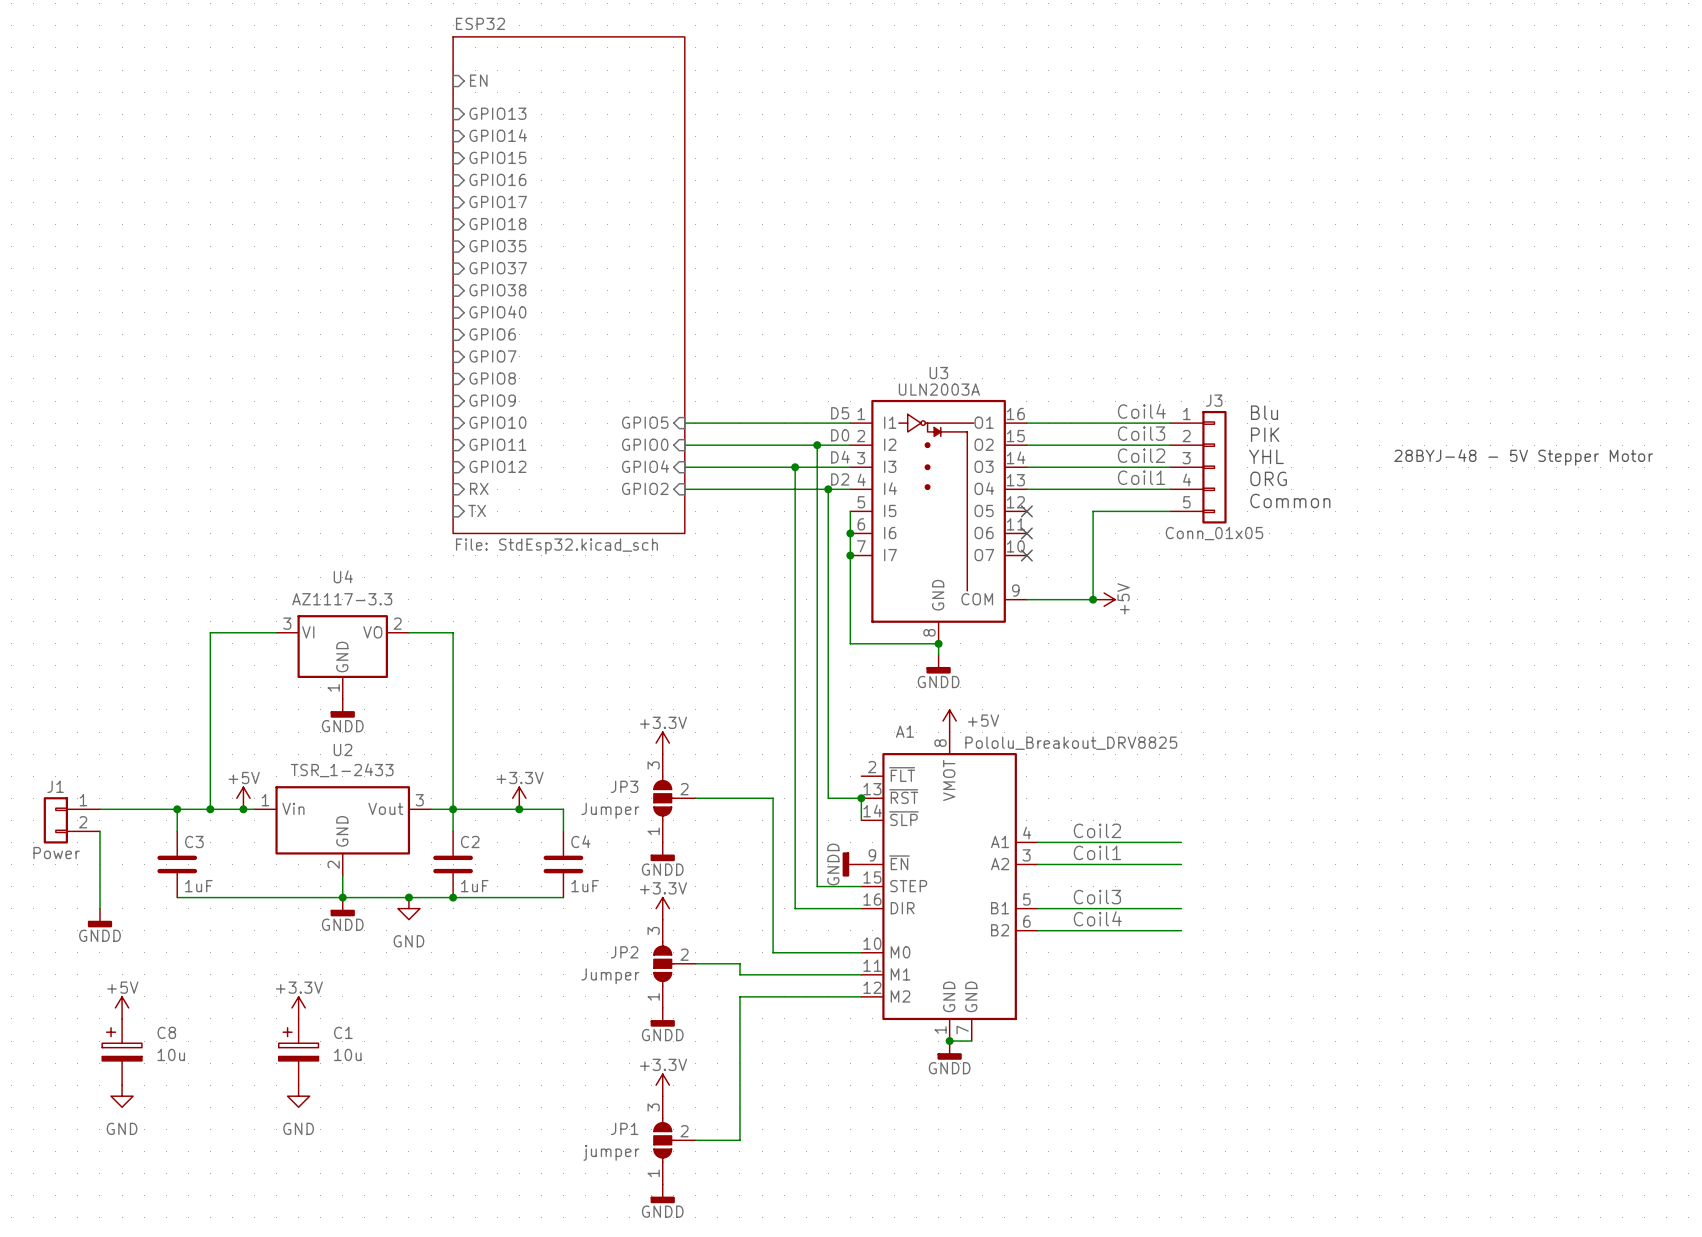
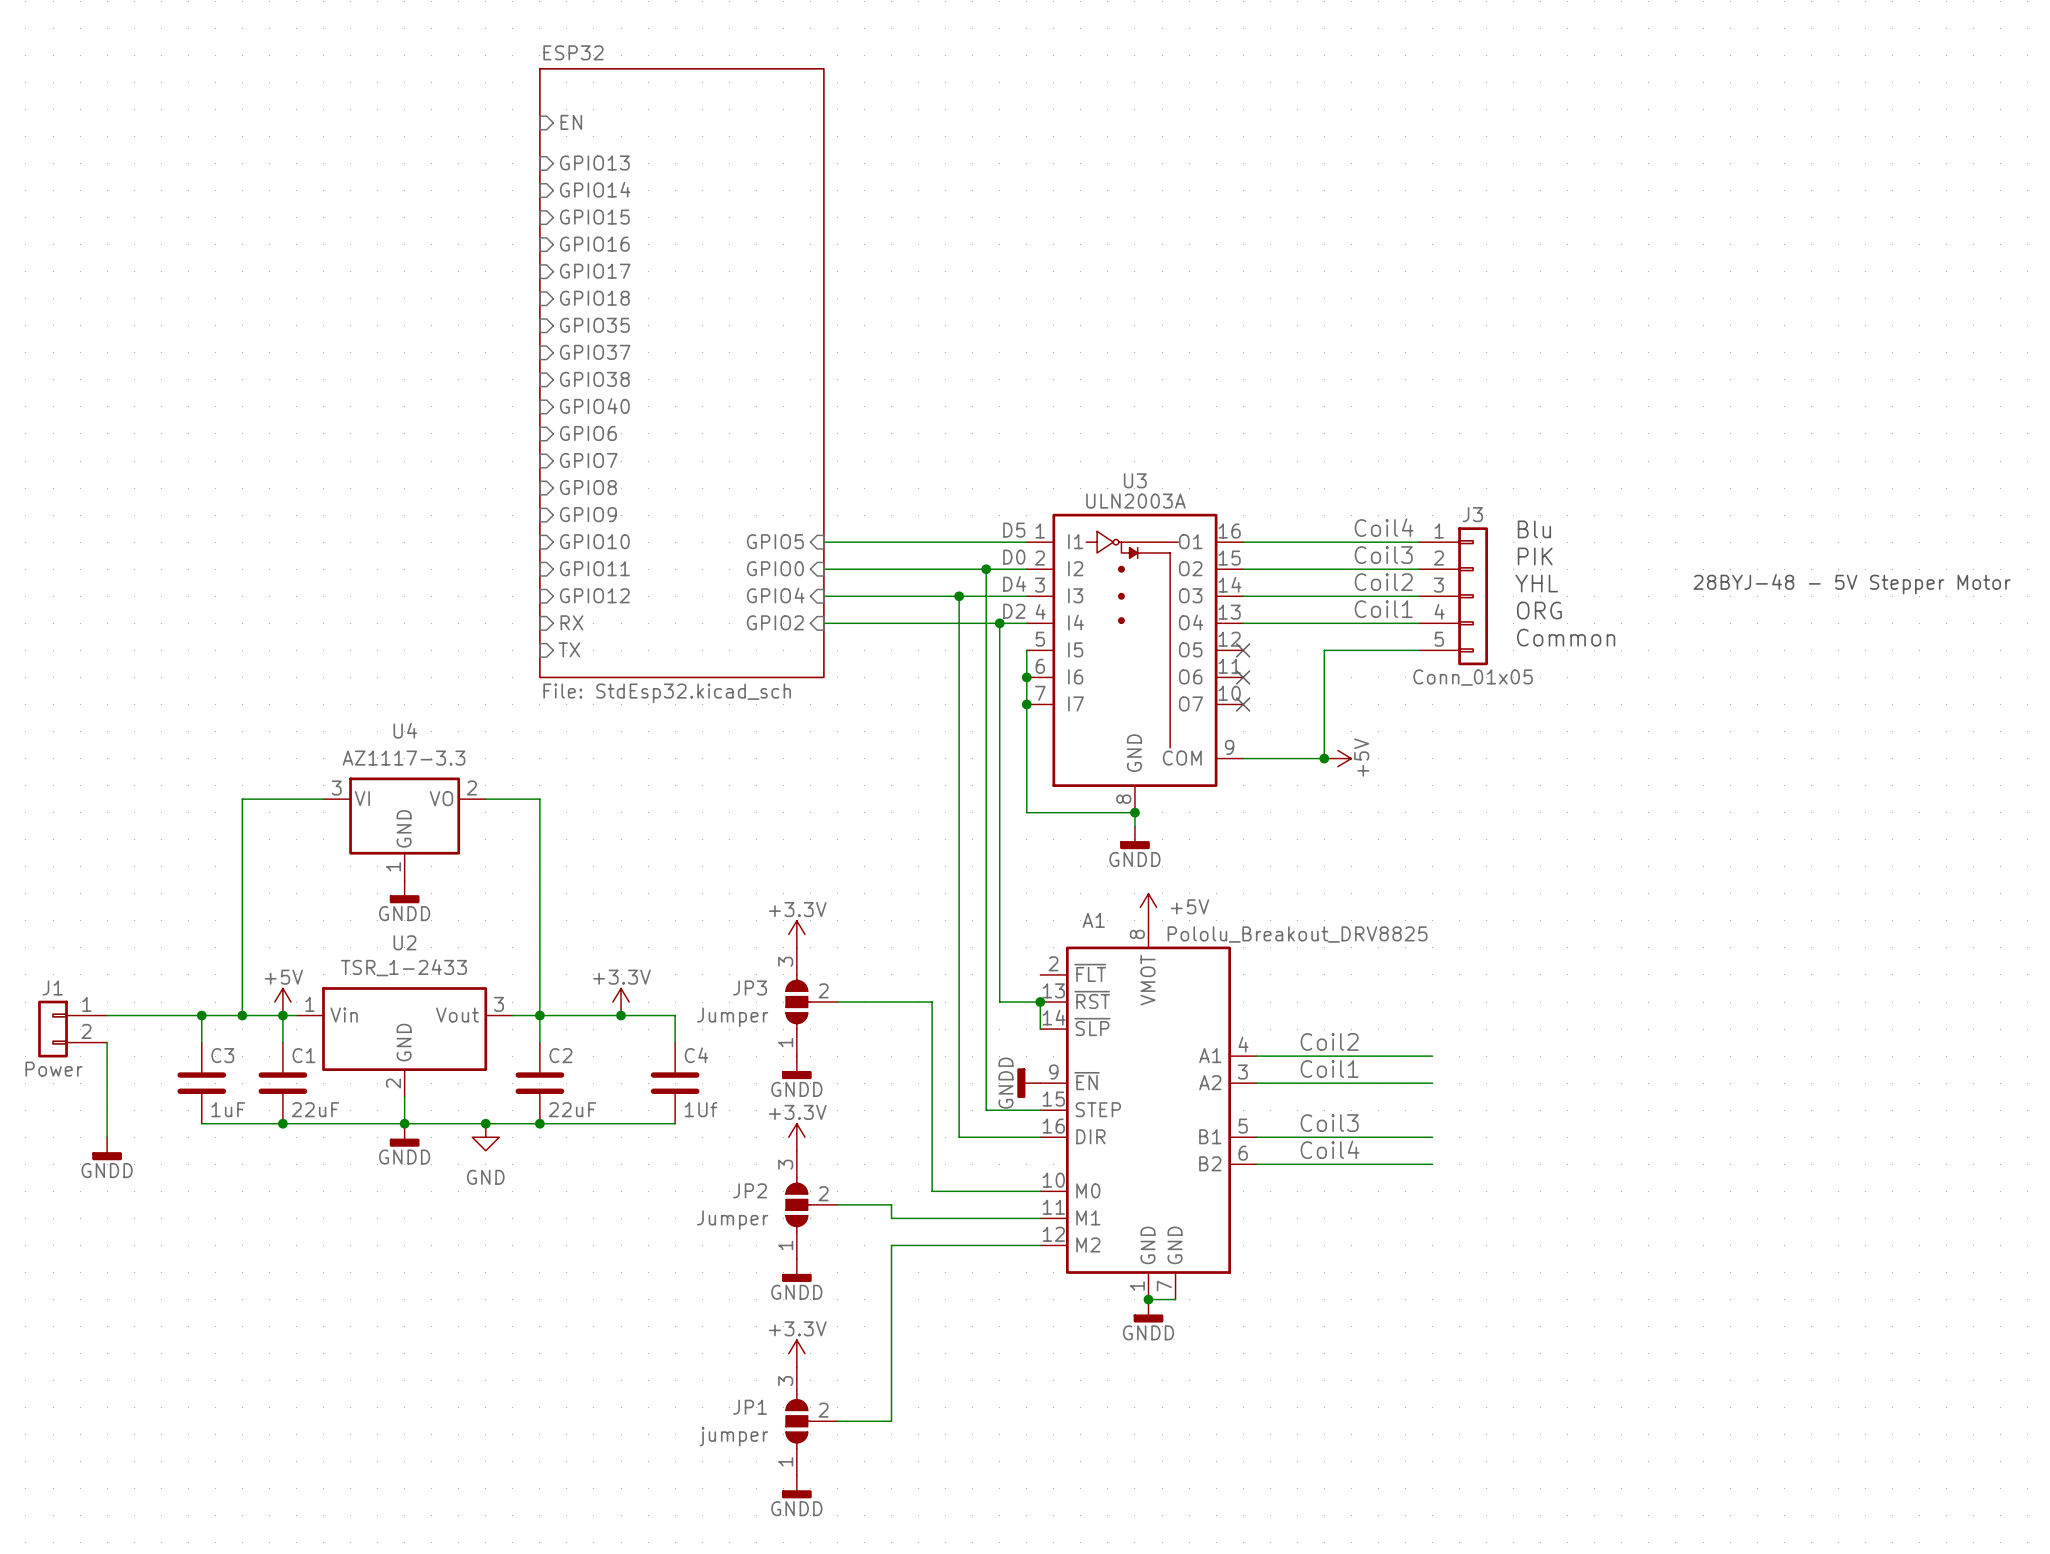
wire: none -> (282, 1015) (282, 1042)
C2 value: 1uF (474, 886) -> 22uF (572, 1109)
C4 value: 1uF (585, 886) -> 1Uf (700, 1109)
junction: none -> (282, 1123)
power symbol: +5V (122, 1007) -> none
power symbol: +3.3V (298, 1007) -> none
C1 symbol: [278, 1018, 319, 1086] -> [258, 1042, 308, 1124]
C1 name position: C1 (343, 1032) -> C1 (303, 1055)
C8: 10u (122, 1052) -> none
C1 value: 10u (347, 1054) -> 22uF (315, 1109)
power symbol: GND (122, 1096) -> none
power symbol: GND (298, 1096) -> none

